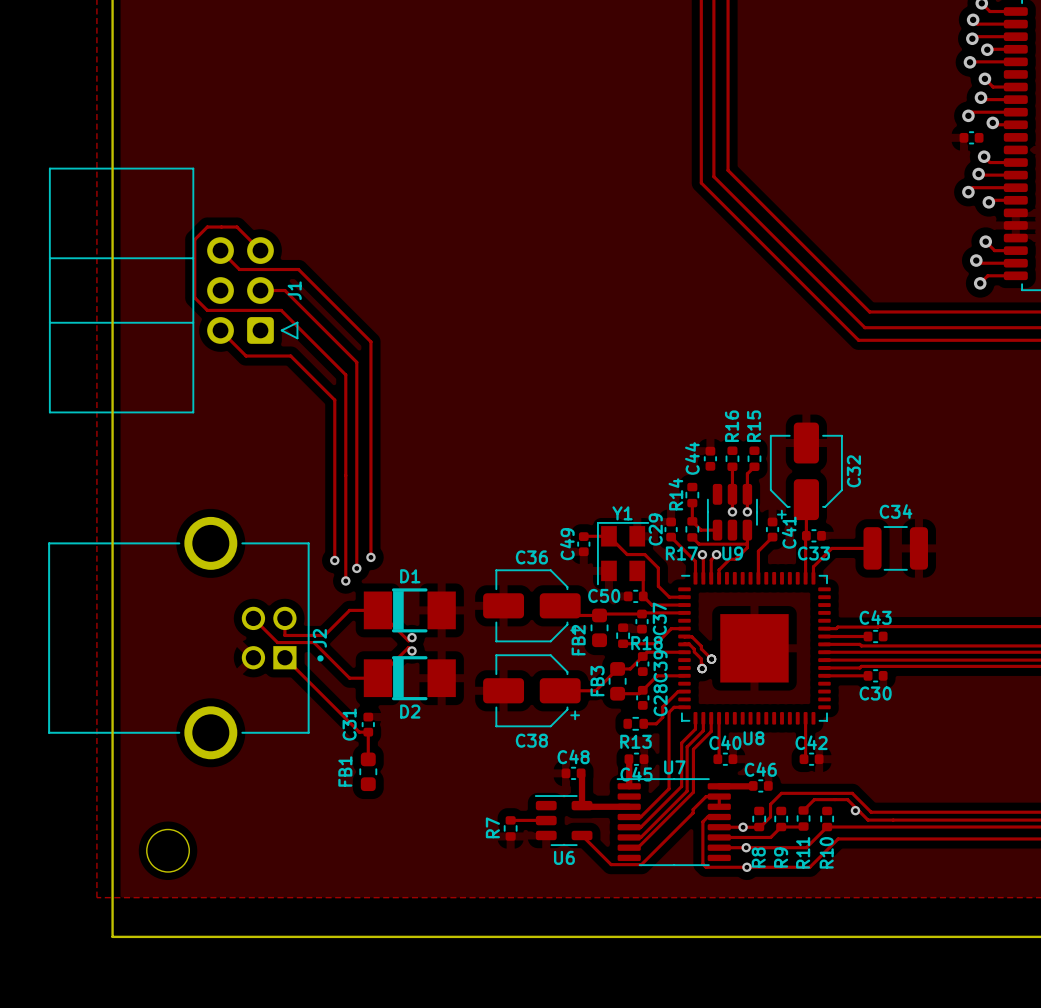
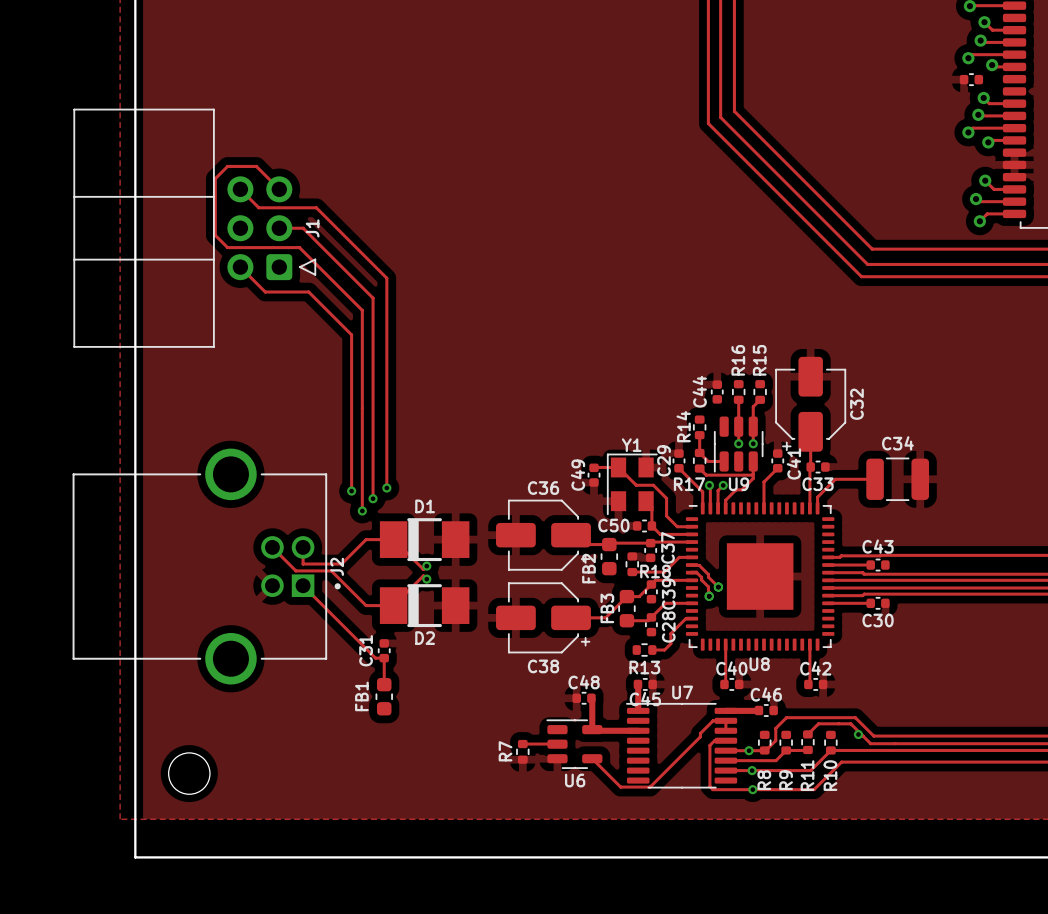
track: (684, 707) (674, 707) (669, 712) (669, 788) (640, 817) (629, 817) -> none
track: (695, 718) (695, 729) (681, 743) (681, 786) (640, 827) (629, 827) -> none
track: (703, 718) (703, 730) (687, 746) (687, 791) (640, 837) (629, 837) -> none
track: (711, 718) (711, 731) (693, 749) (693, 792) (637, 847) (629, 847) -> none

